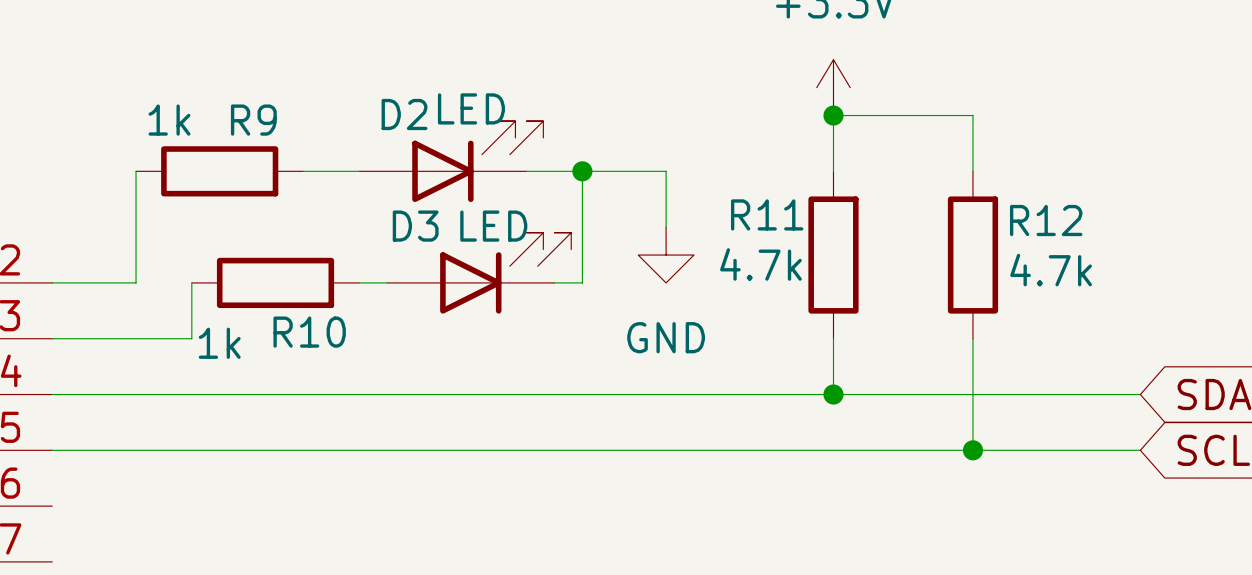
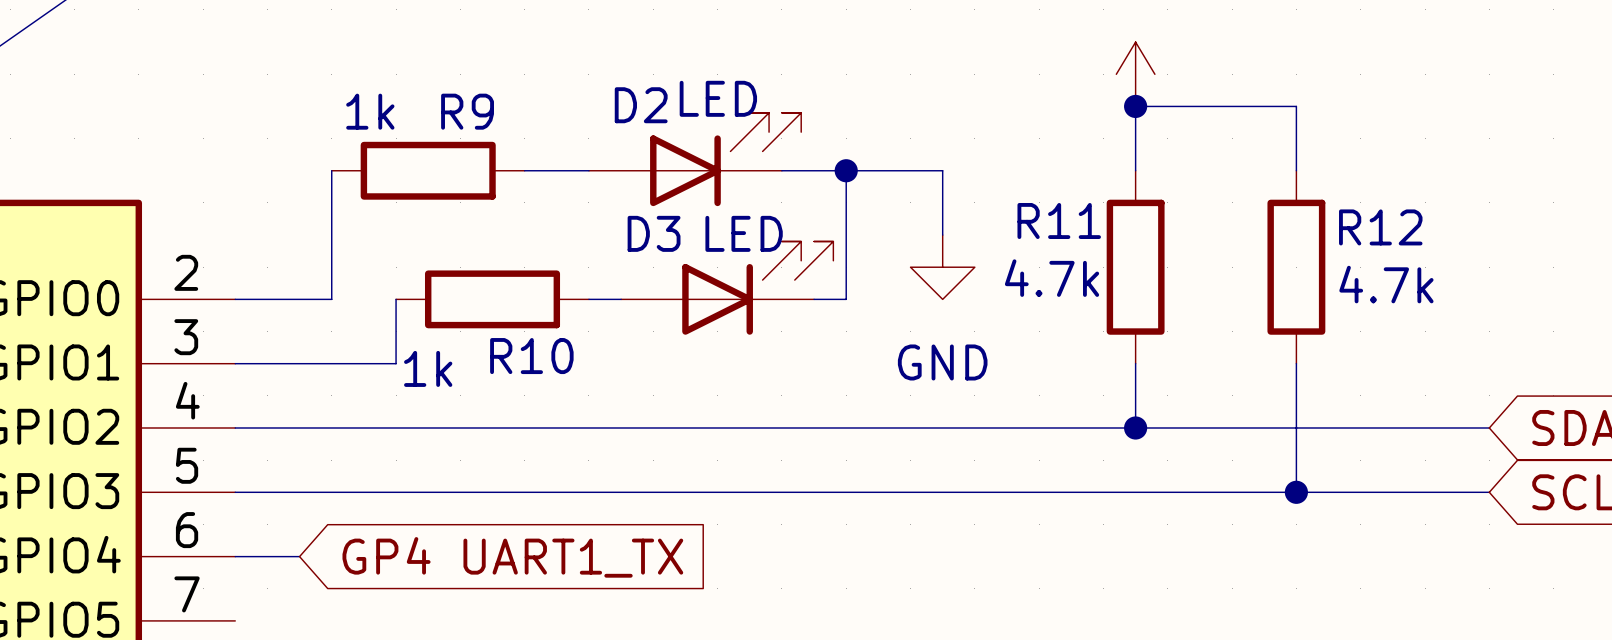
wire: none -> (235, 556) (299, 556)
global label: none -> GP4 UART1_TX (512, 557)

